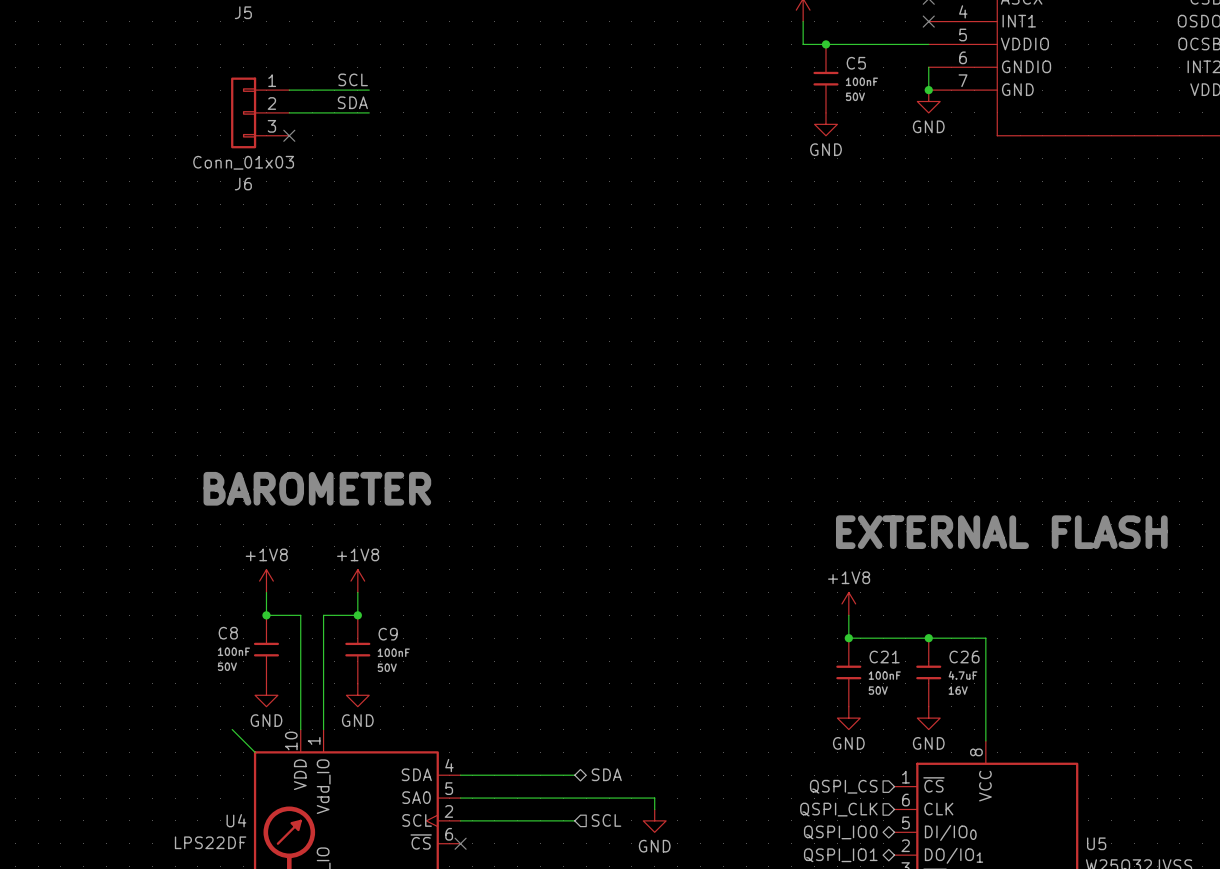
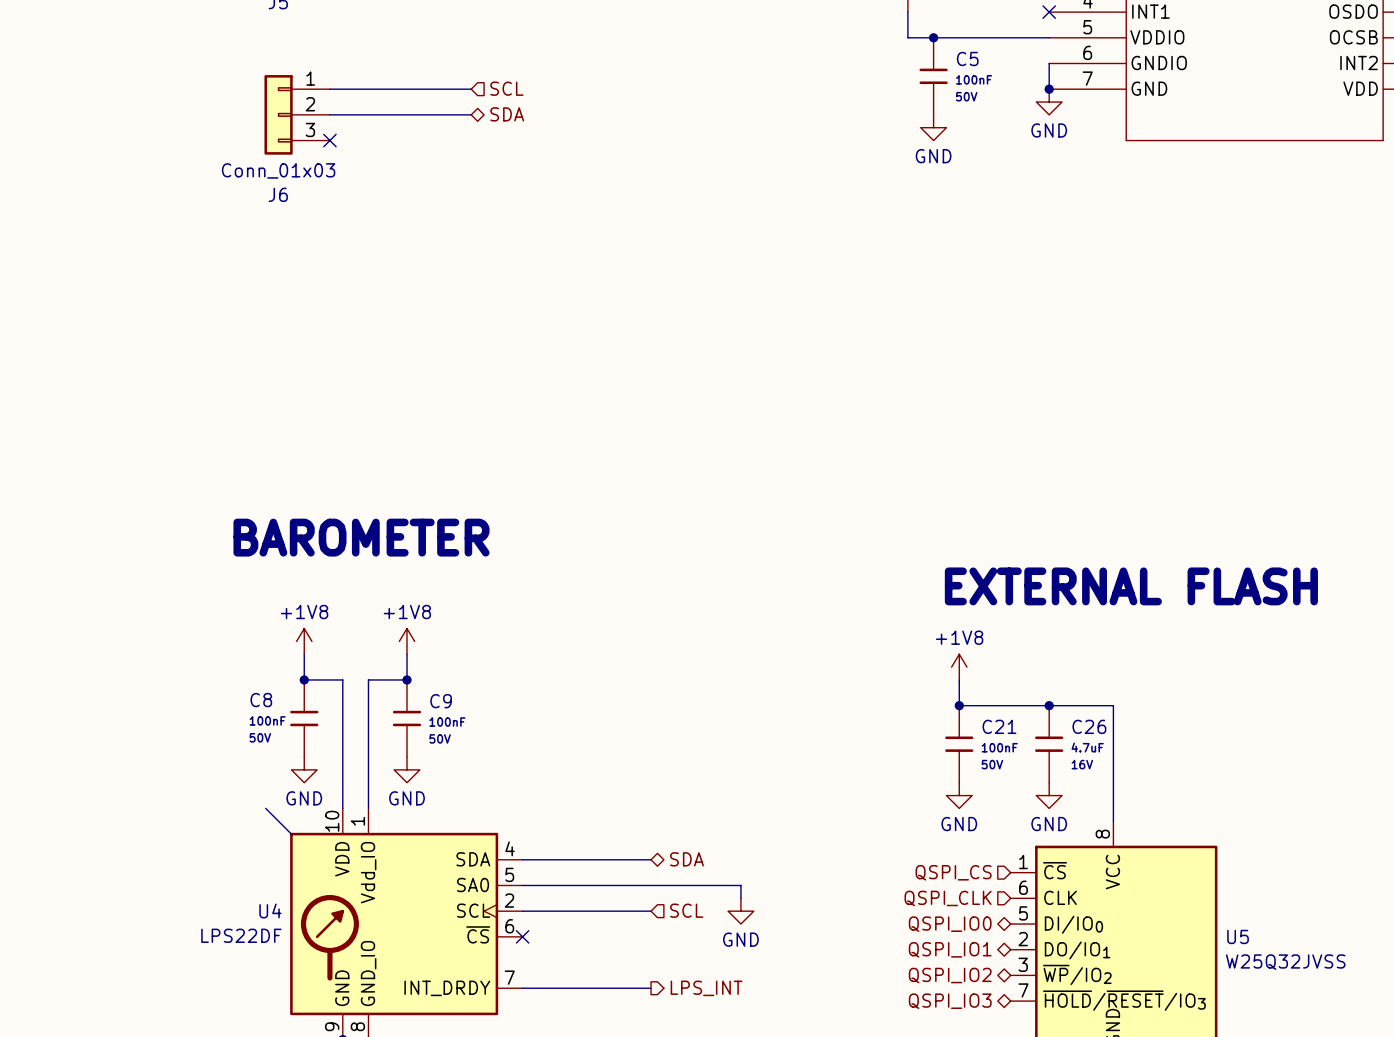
label: SCL (353, 79) -> none
hierarchical label: none -> SCL (506, 88)
wire: none -> (419, 89) (471, 89)
label: SDA (352, 102) -> none
wire: none -> (419, 114) (471, 114)
hierarchical label: none -> SDA (507, 114)

